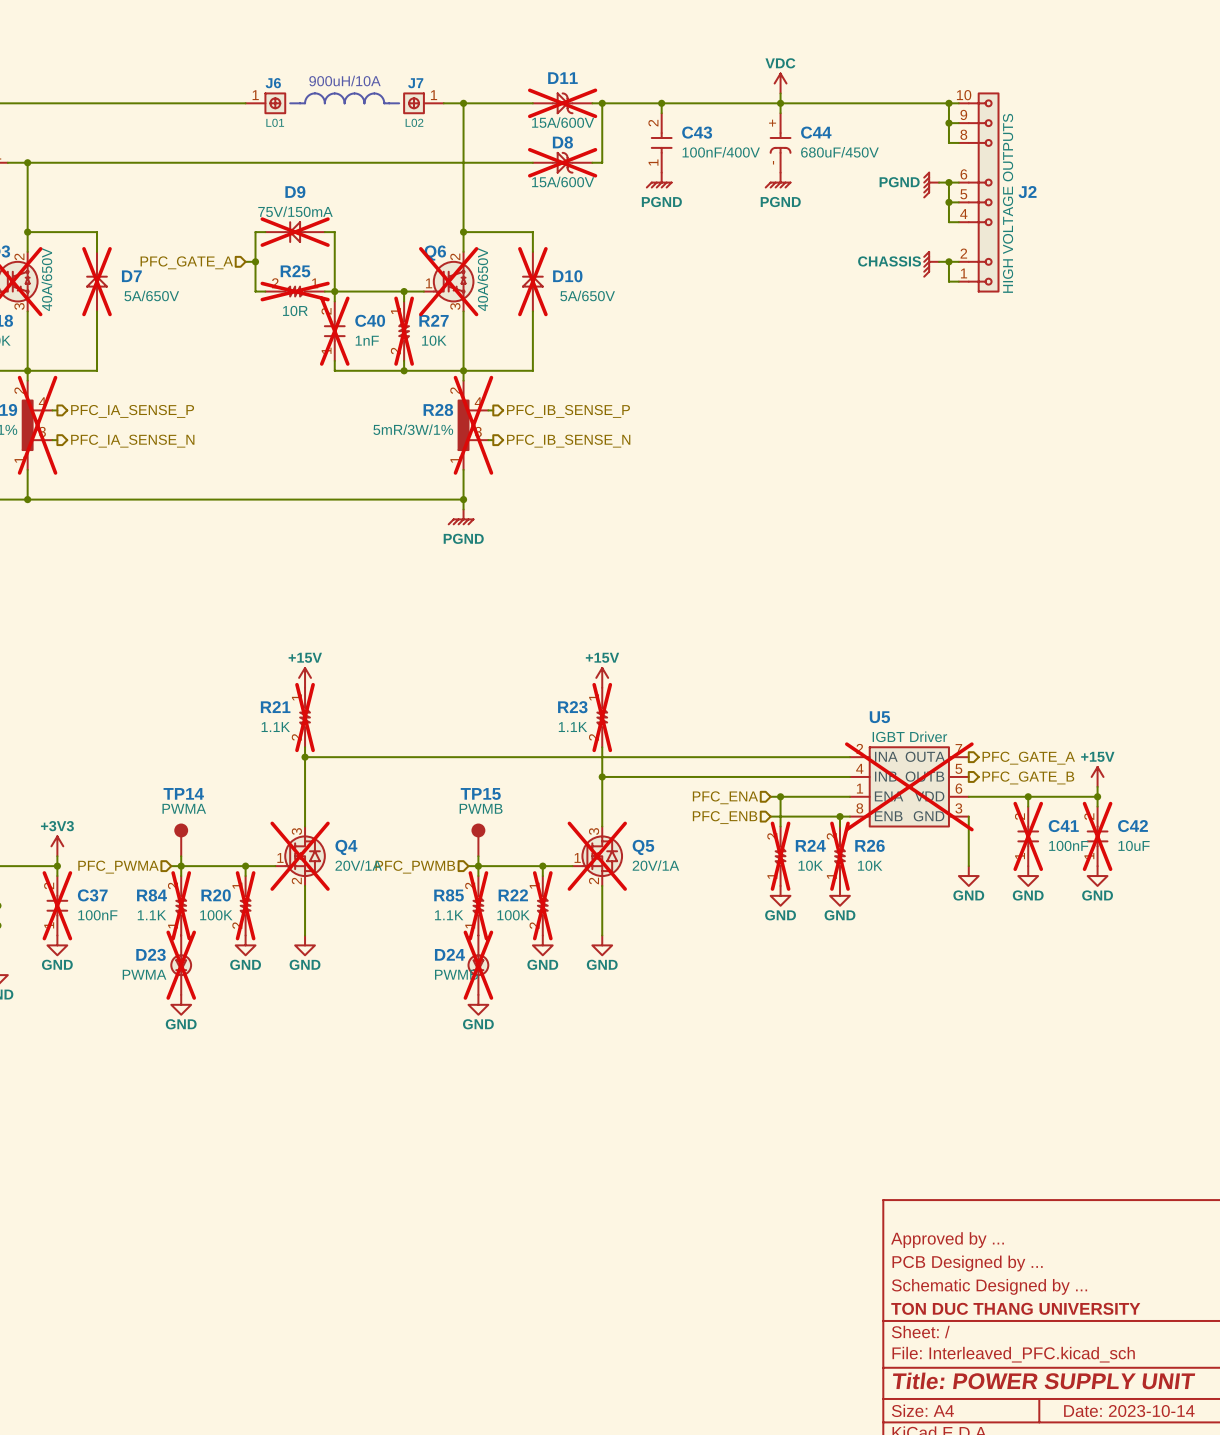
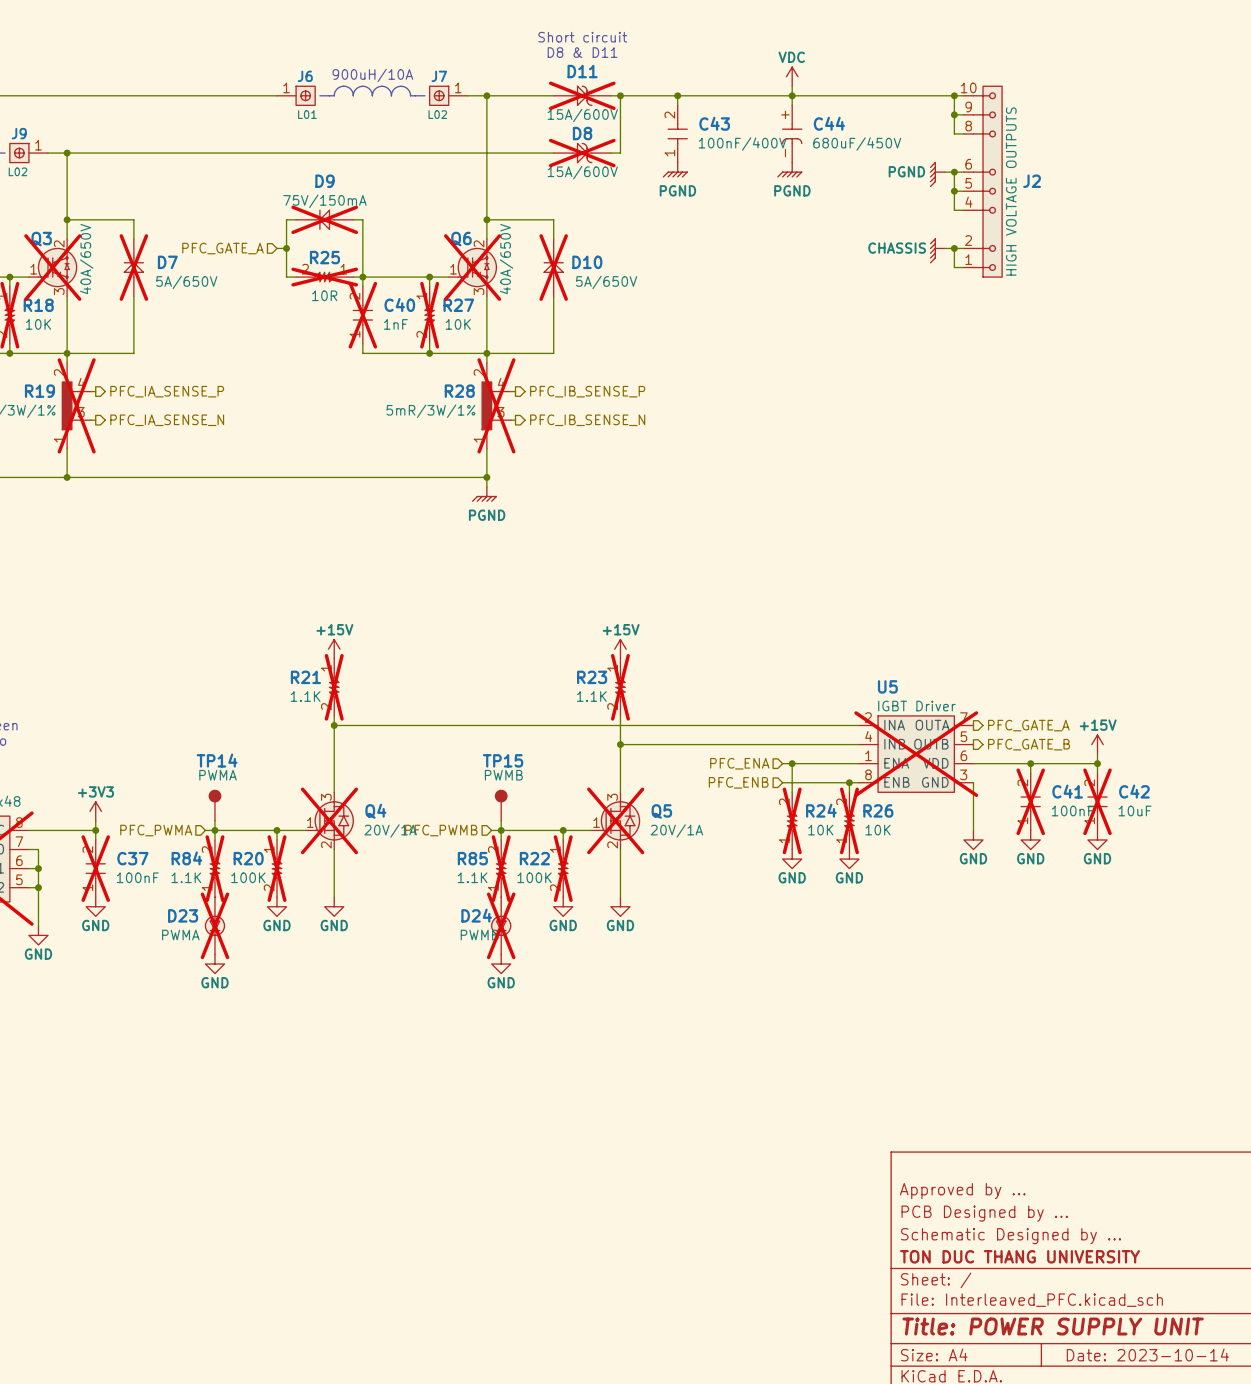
text: none -> Short circuit (582, 37)
text: none -> D8 & D11 (582, 52)

